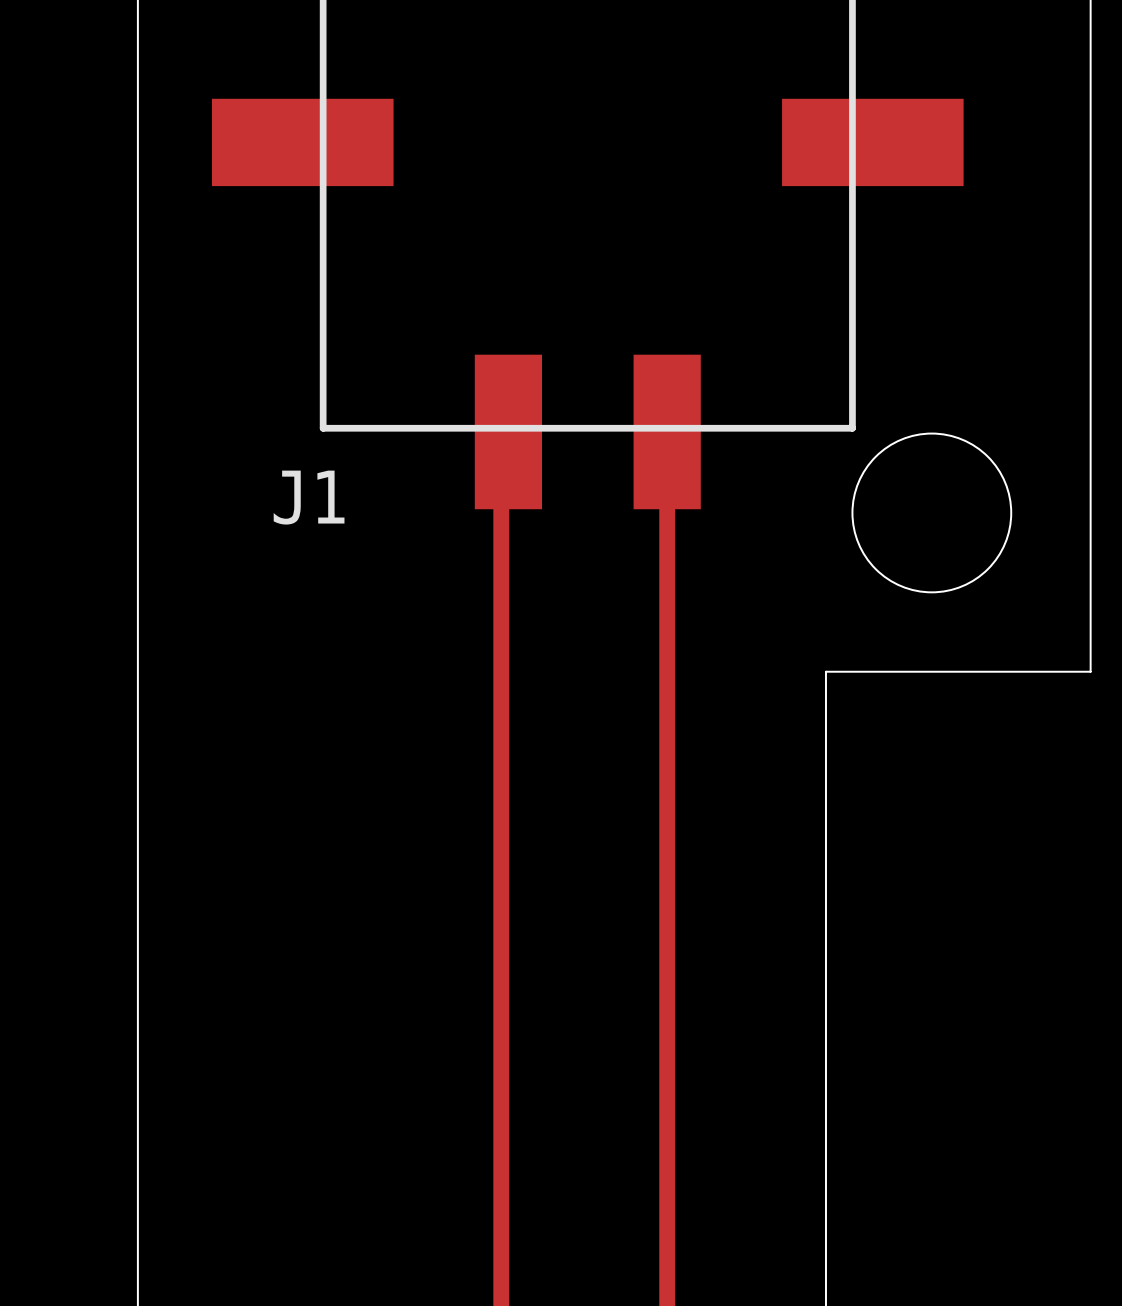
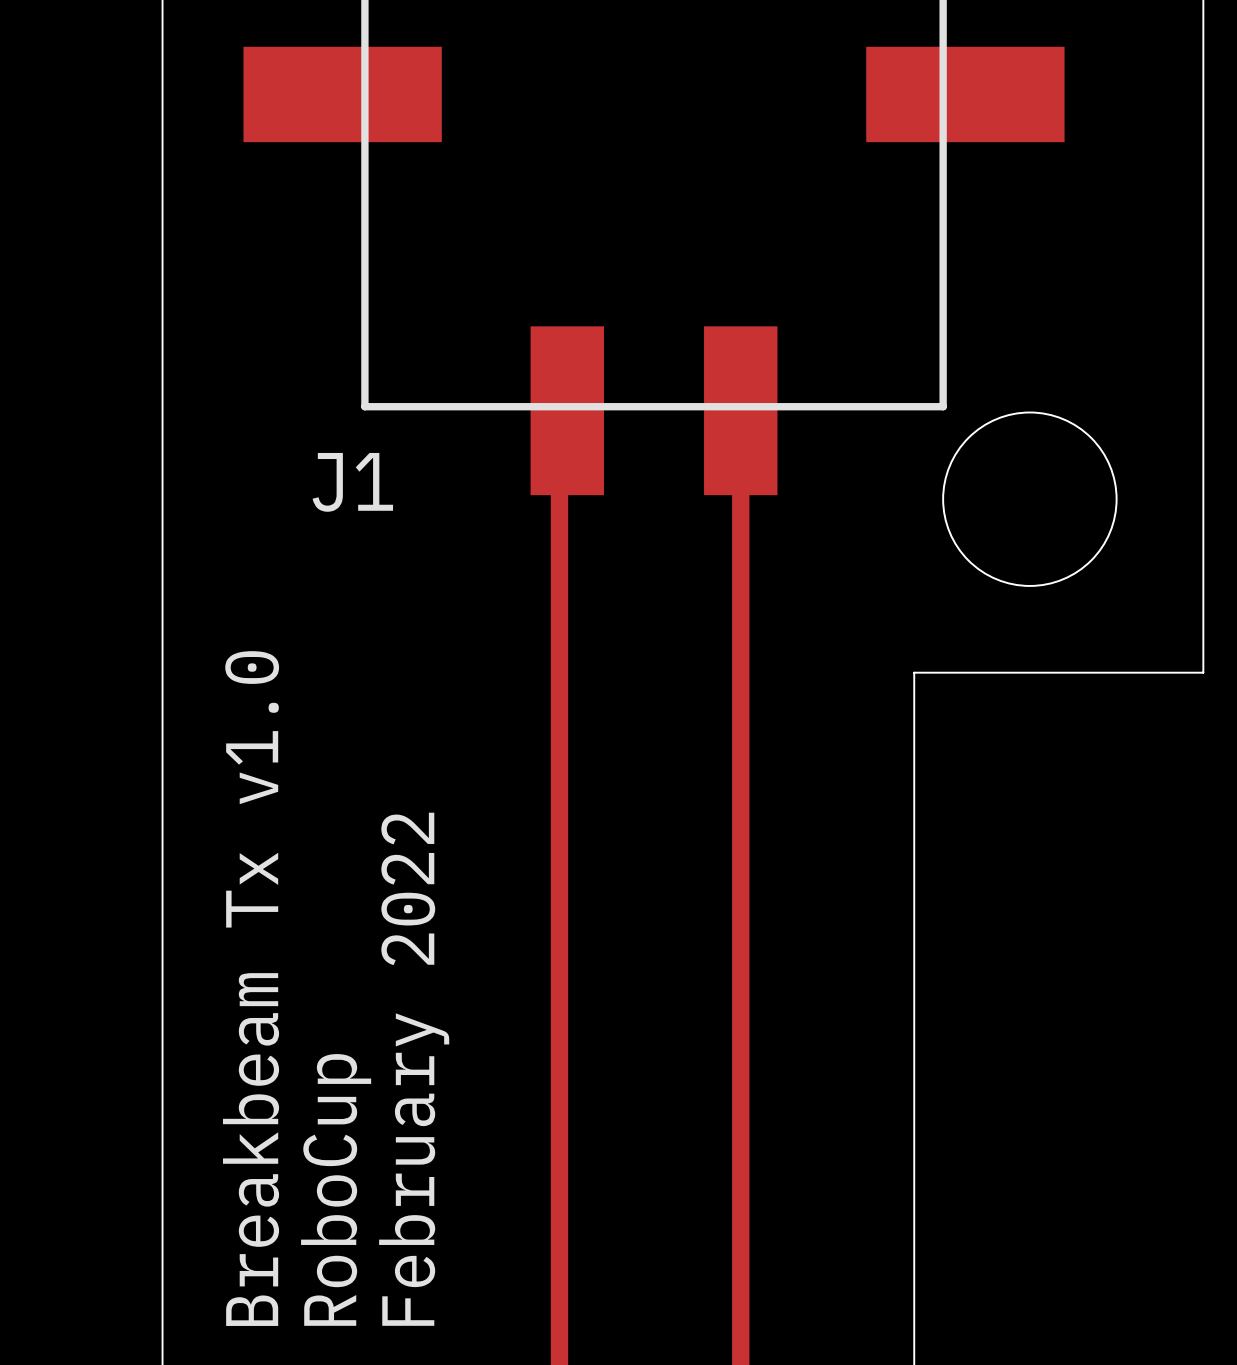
text: none -> Breakbeam Tx v1.0 (251, 988)
text: none -> February 2022 (414, 1069)
text: none -> RoboCup (336, 1189)

